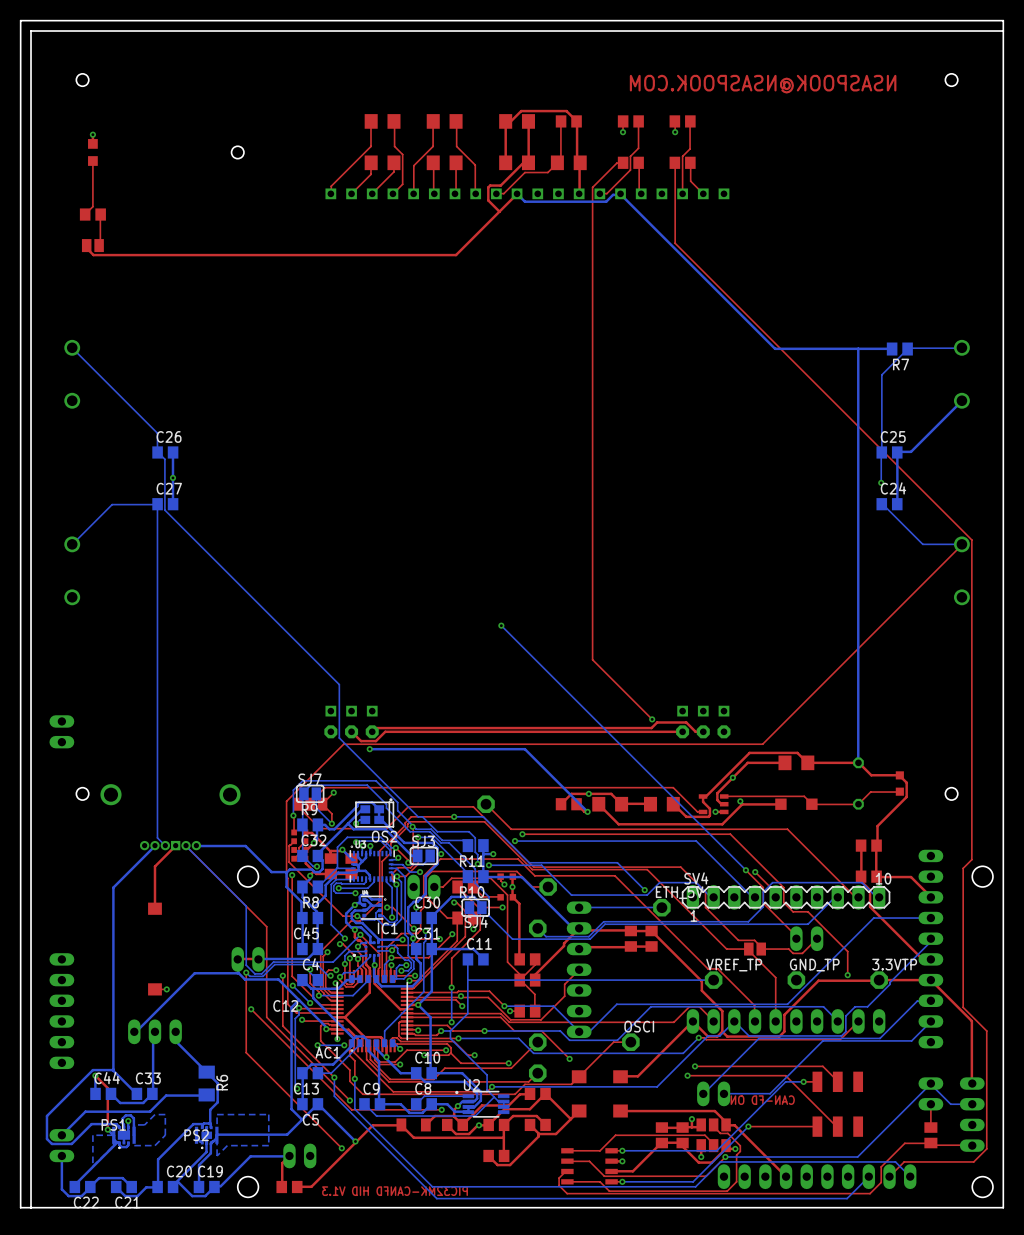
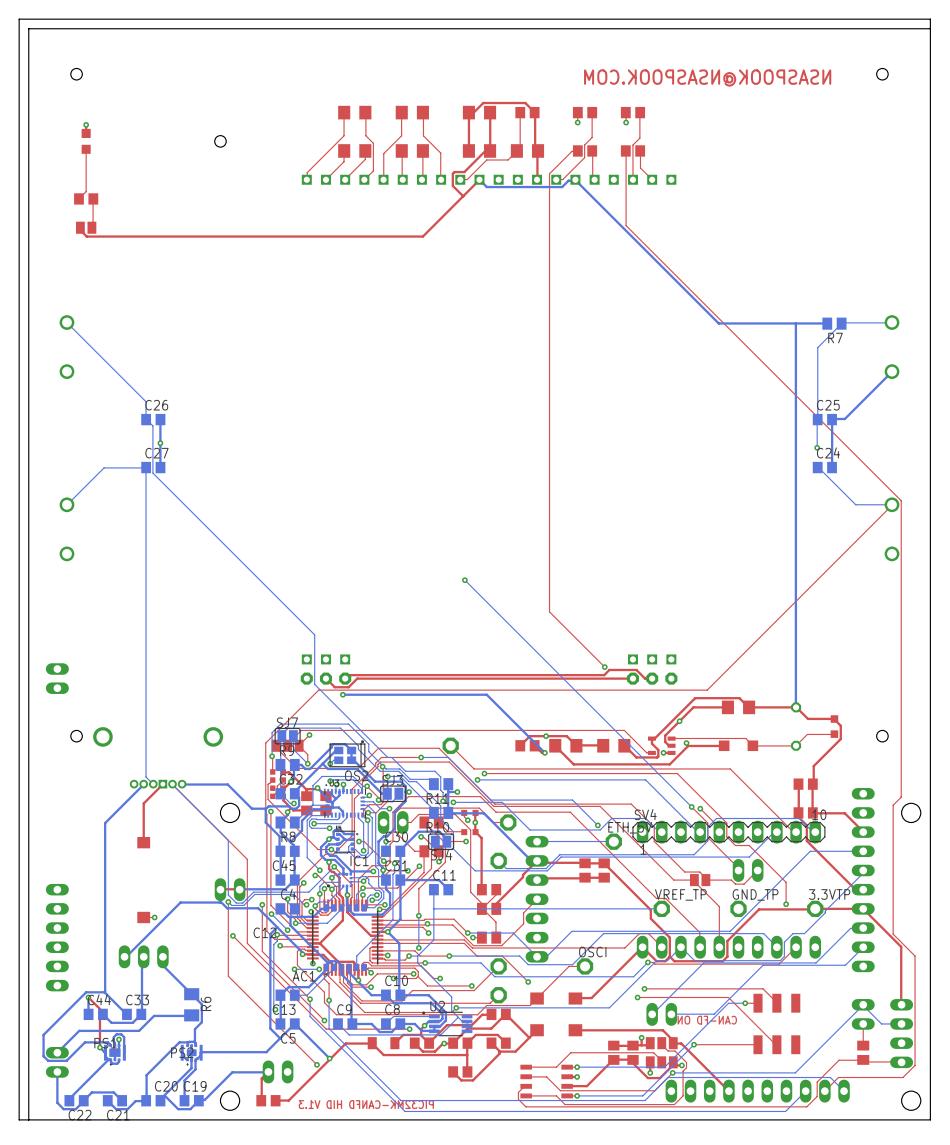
bottom zone outline: (165, 1114) (154, 1114) (144, 1124) (134, 1124) (134, 1145) (154, 1145) (165, 1135) (165, 1114) -> none
bottom zone outline: (268, 1114) (217, 1114) (217, 1155) (227, 1145) (268, 1145) (268, 1114) -> none
bottom zone outline: (113, 1135) (92, 1135) (92, 1166) (113, 1145) (113, 1135) -> none

